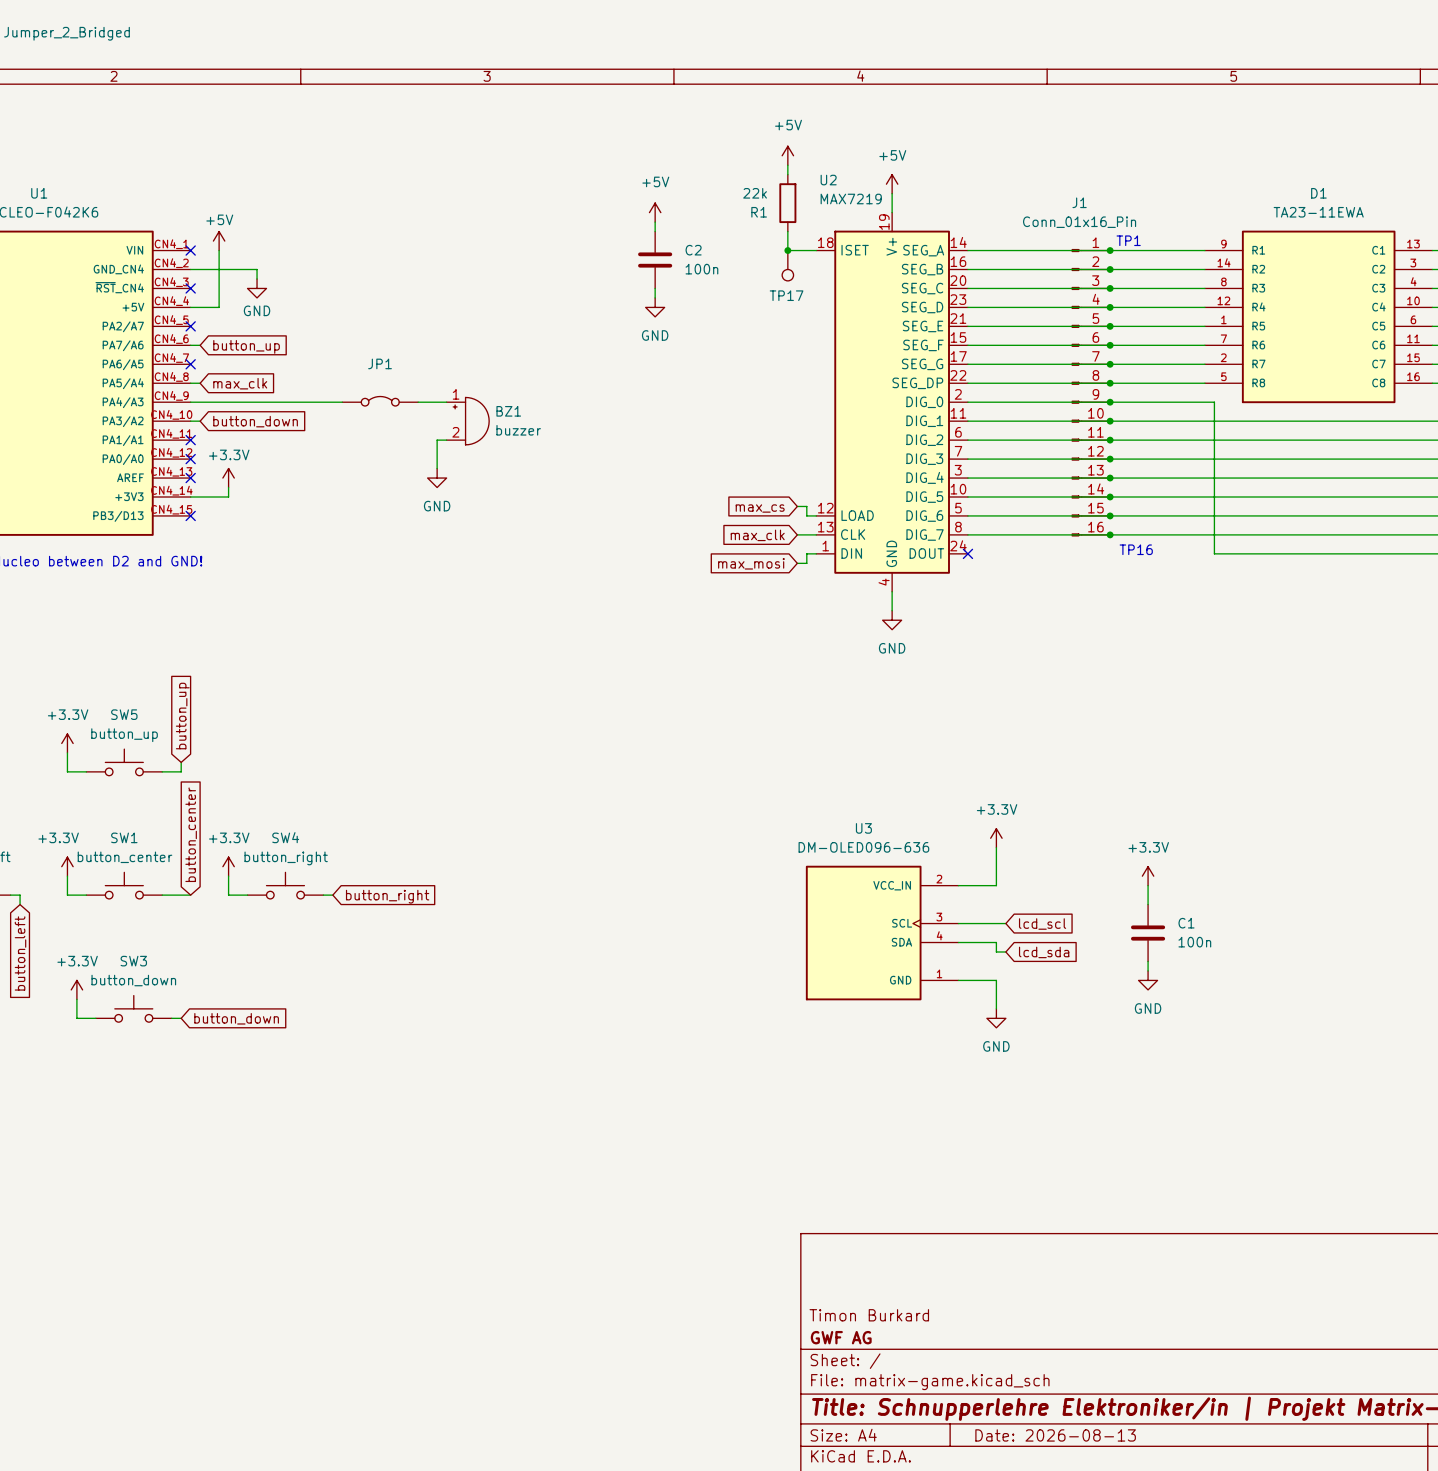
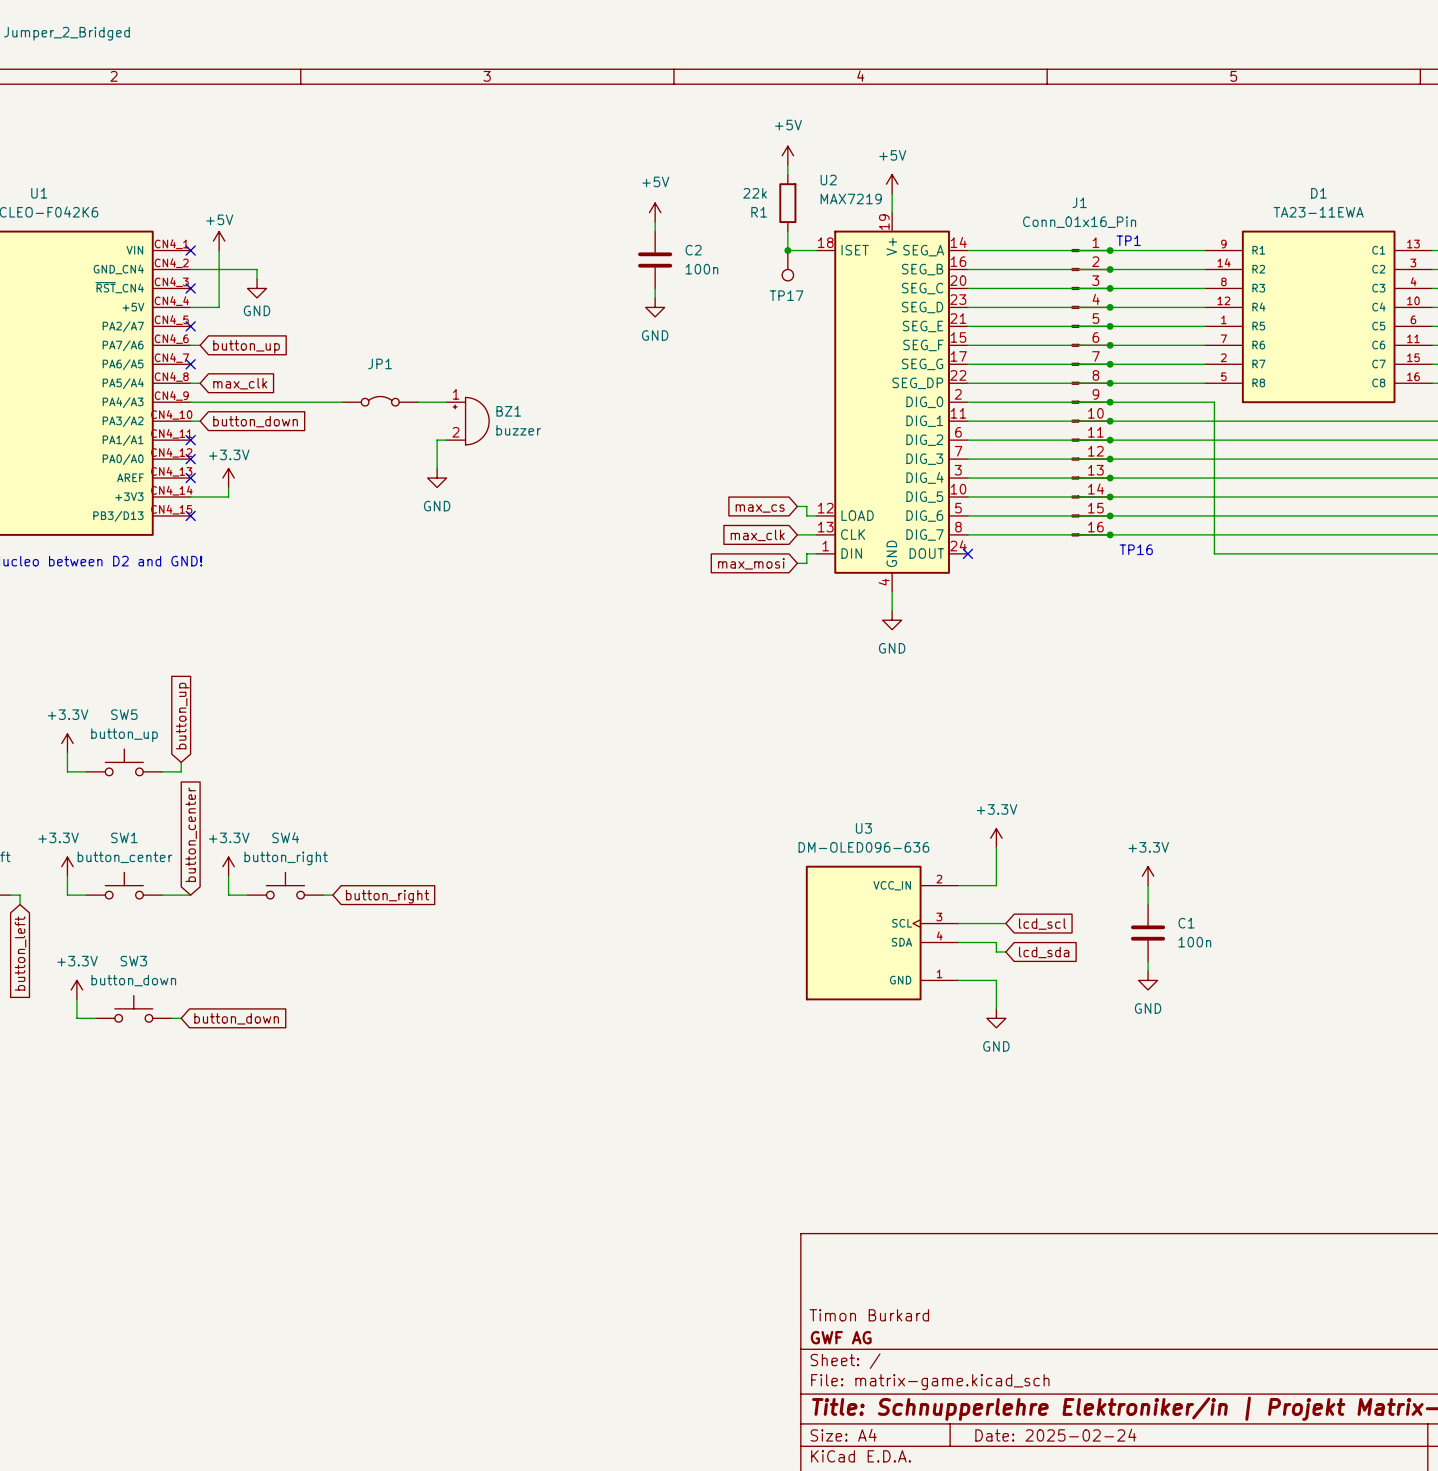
title block: Date: 2026-08-13 (1055, 1435) -> Date: 2025-02-24 (1055, 1435)

